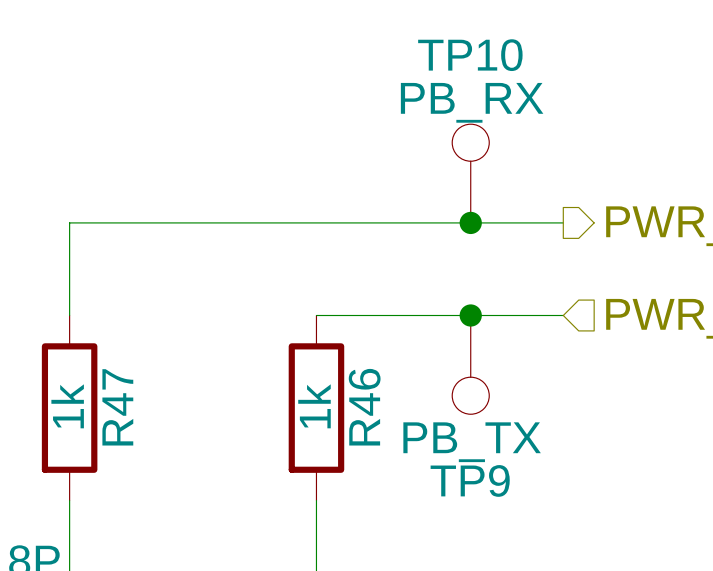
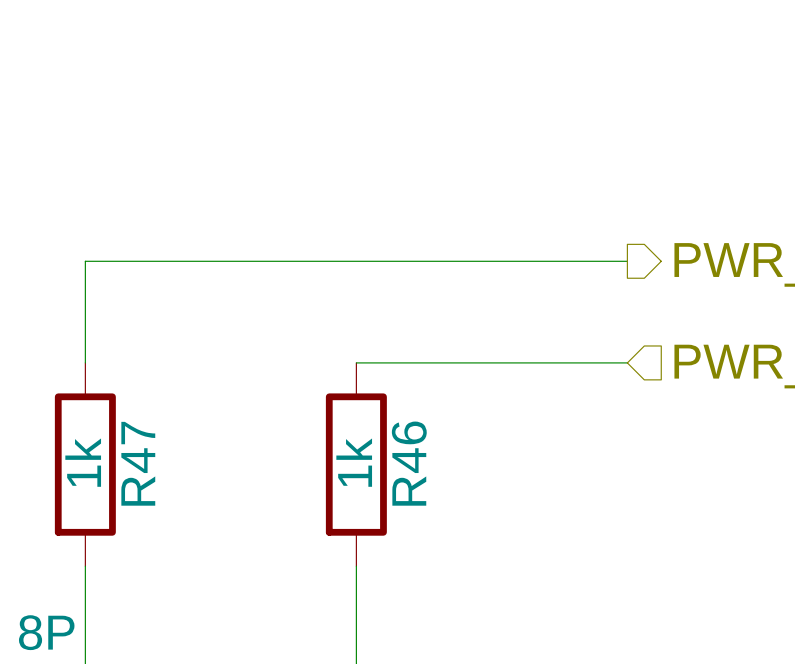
TP10: PB_RX (470, 173) -> none
junction: (470, 222) -> none
junction: (470, 315) -> none
TP9: PB_TX (470, 364) -> none

